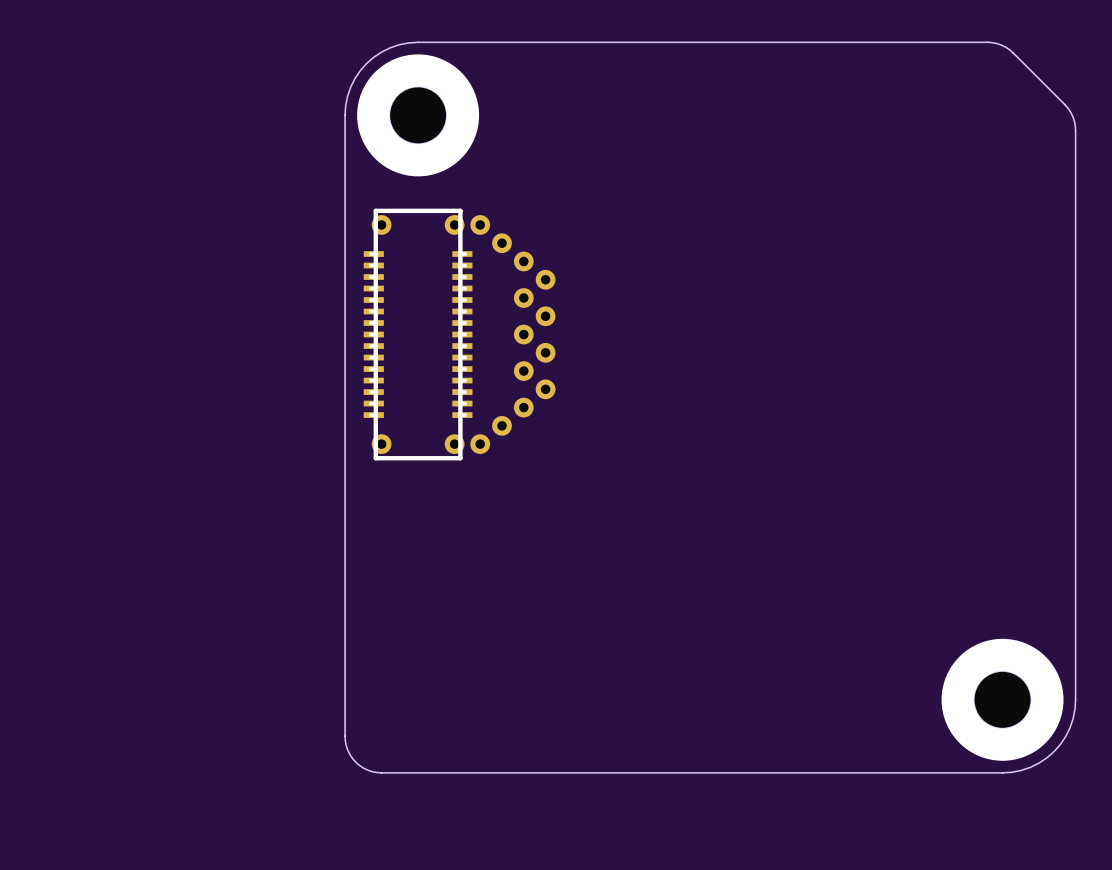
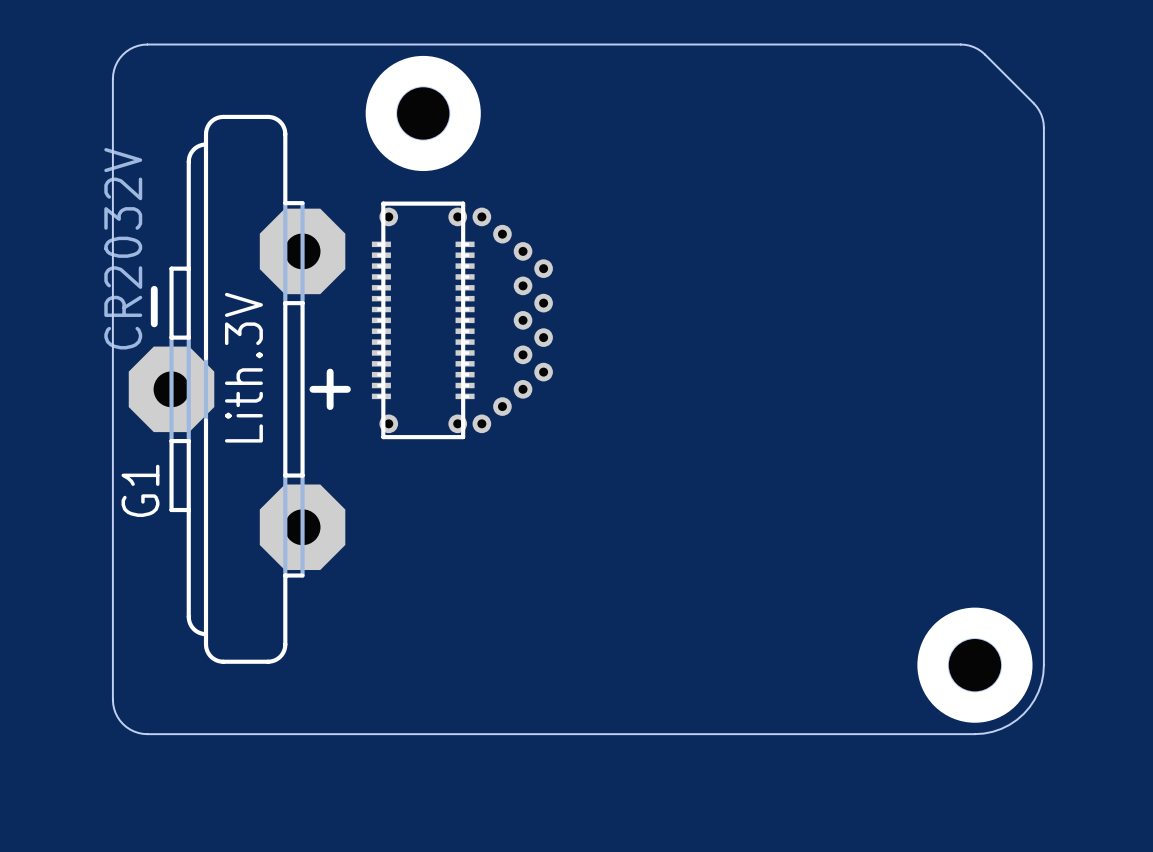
board edge: (418, 42) (390, 47) (366, 63) (350, 87) (345, 115) (345, 736) (347, 750) (355, 762) (367, 770) (381, 772) -> (423, 44) (142, 44) (130, 49) (120, 58) (114, 70) (112, 78) (112, 699) (115, 712) (126, 727) (142, 733) (388, 734)
G1: none -> CR2032V (239, 389)

